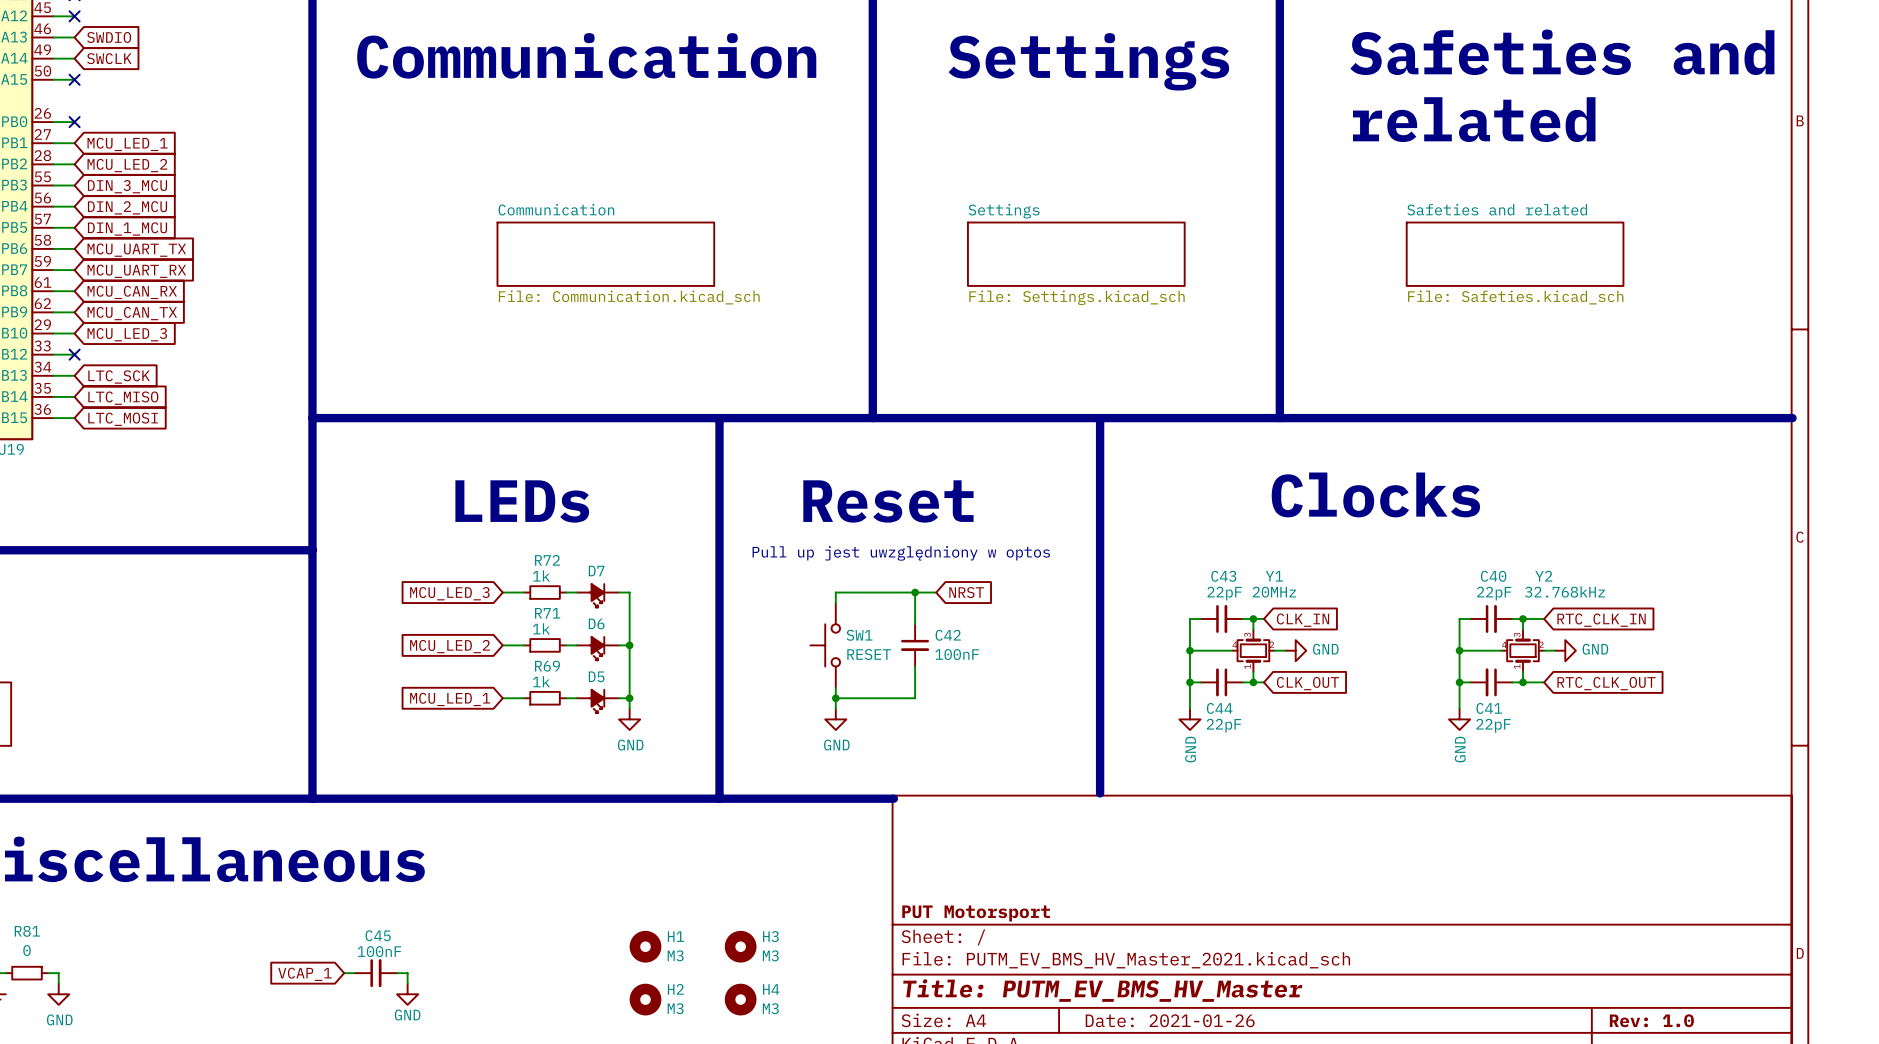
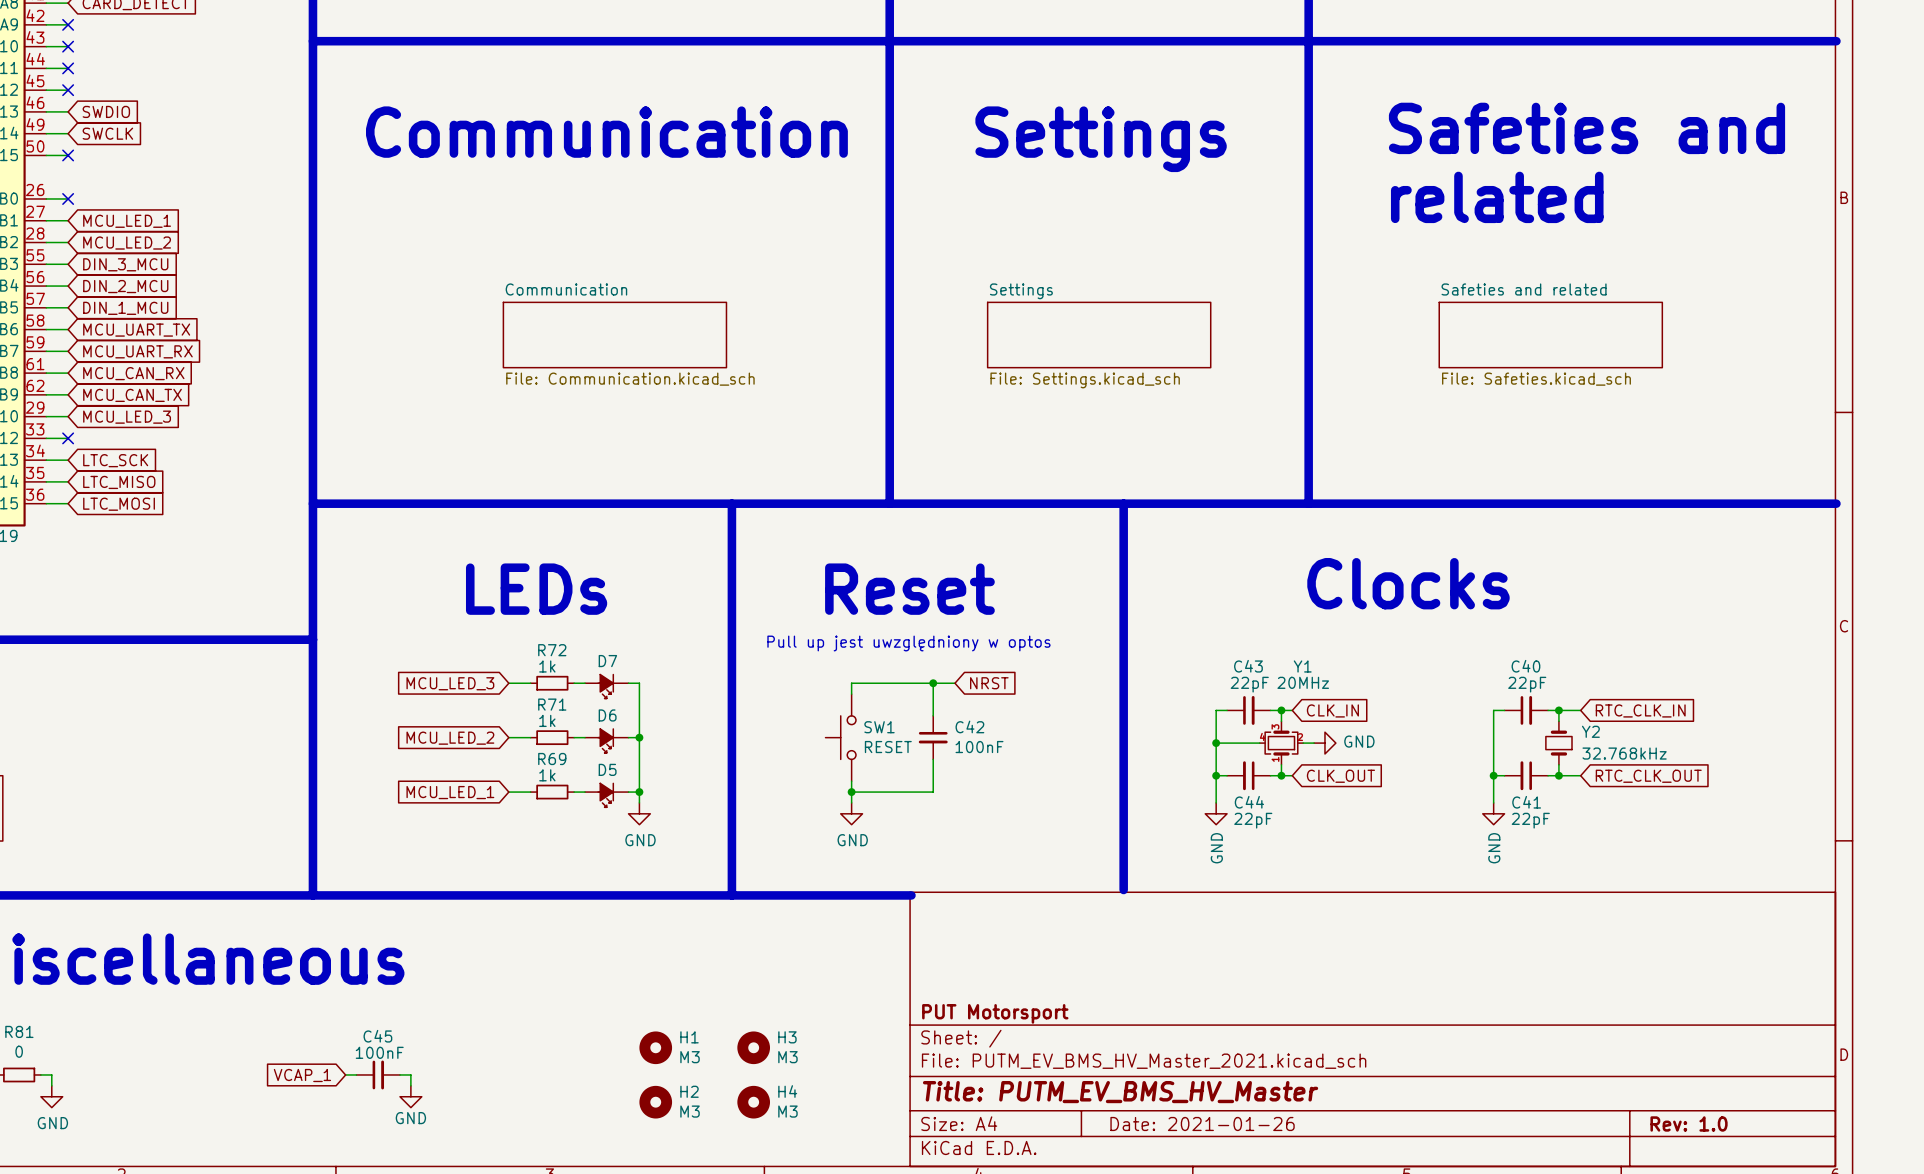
Y2 name position: Y2 (1543, 576) -> Y2 (1590, 731)
Y2 value position: 32.768kHz (1565, 591) -> 32.768kHz (1624, 753)
Y2 symbol: [1501, 629, 1545, 672] -> [1545, 721, 1573, 765]
wire: (1459, 650) (1501, 650) -> none
junction: (1459, 650) -> none
wire: (1544, 650) (1554, 650) -> none
power symbol: GND (1565, 650) -> none

